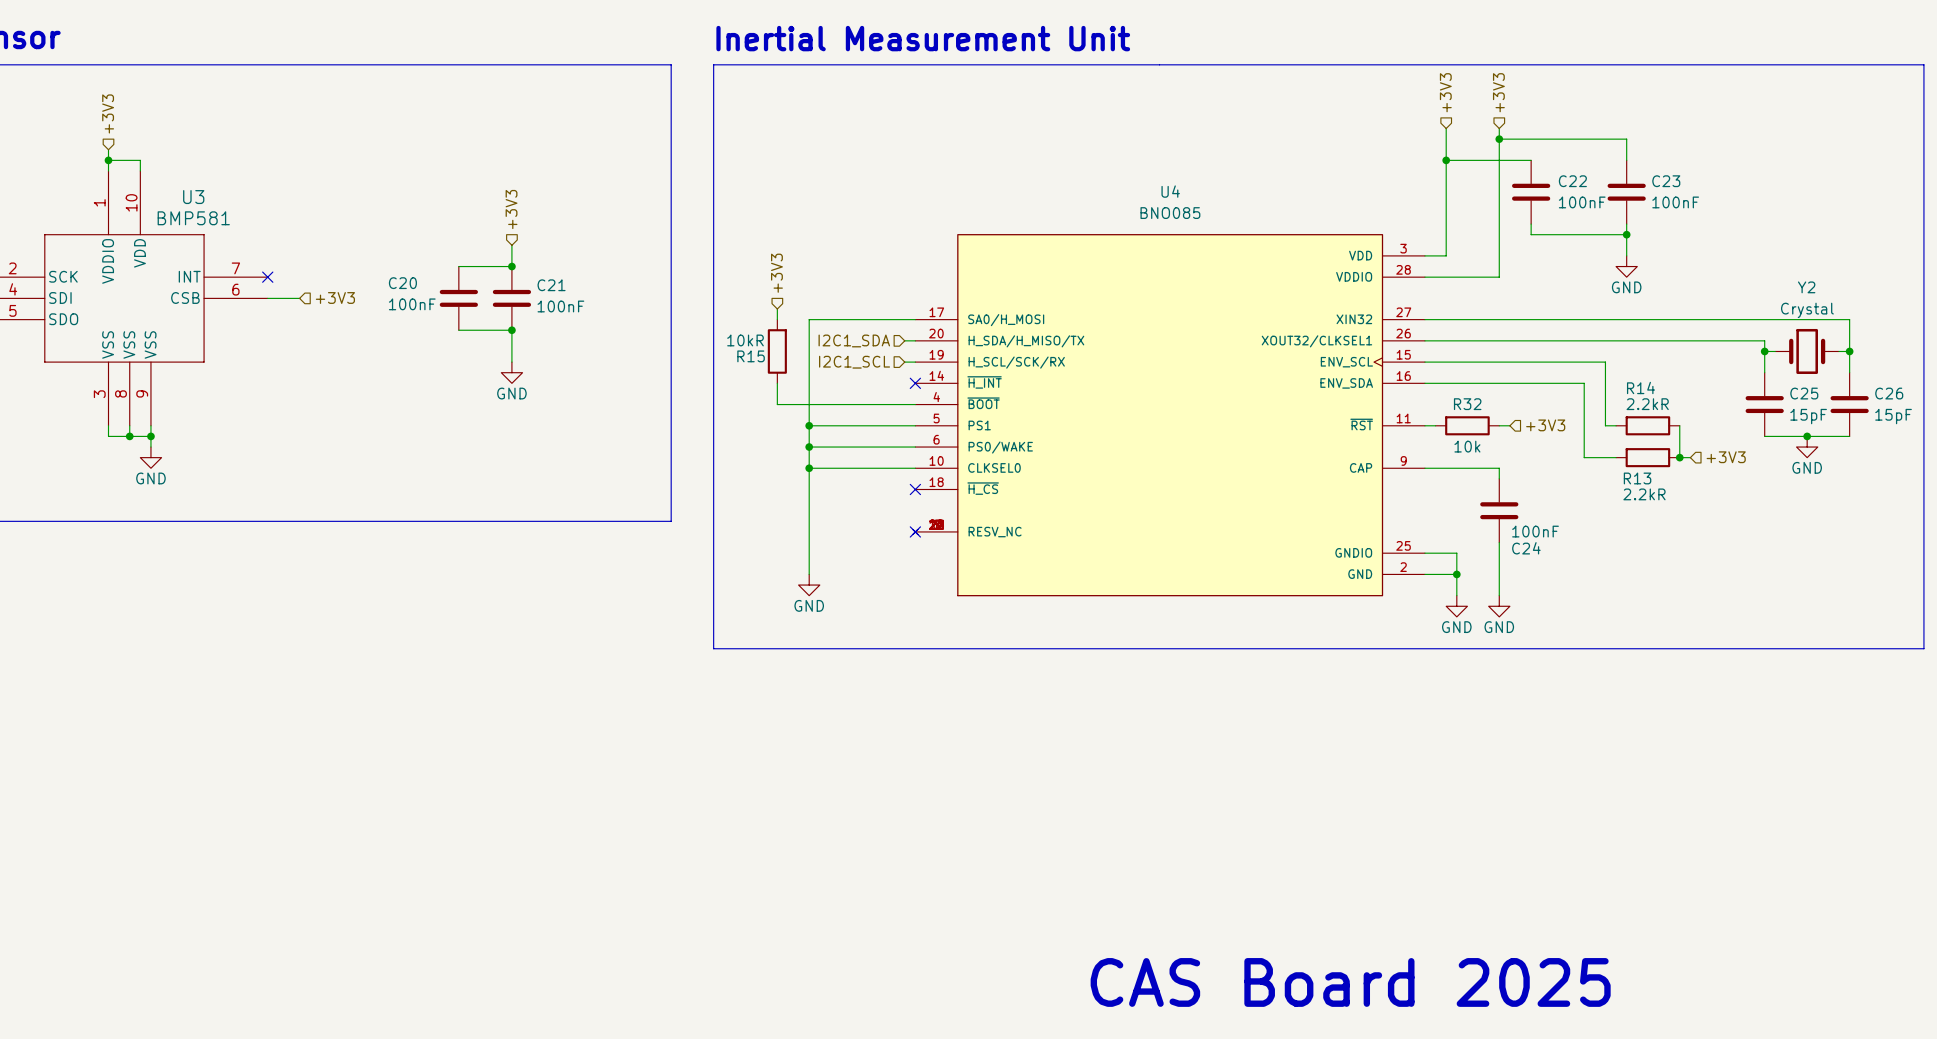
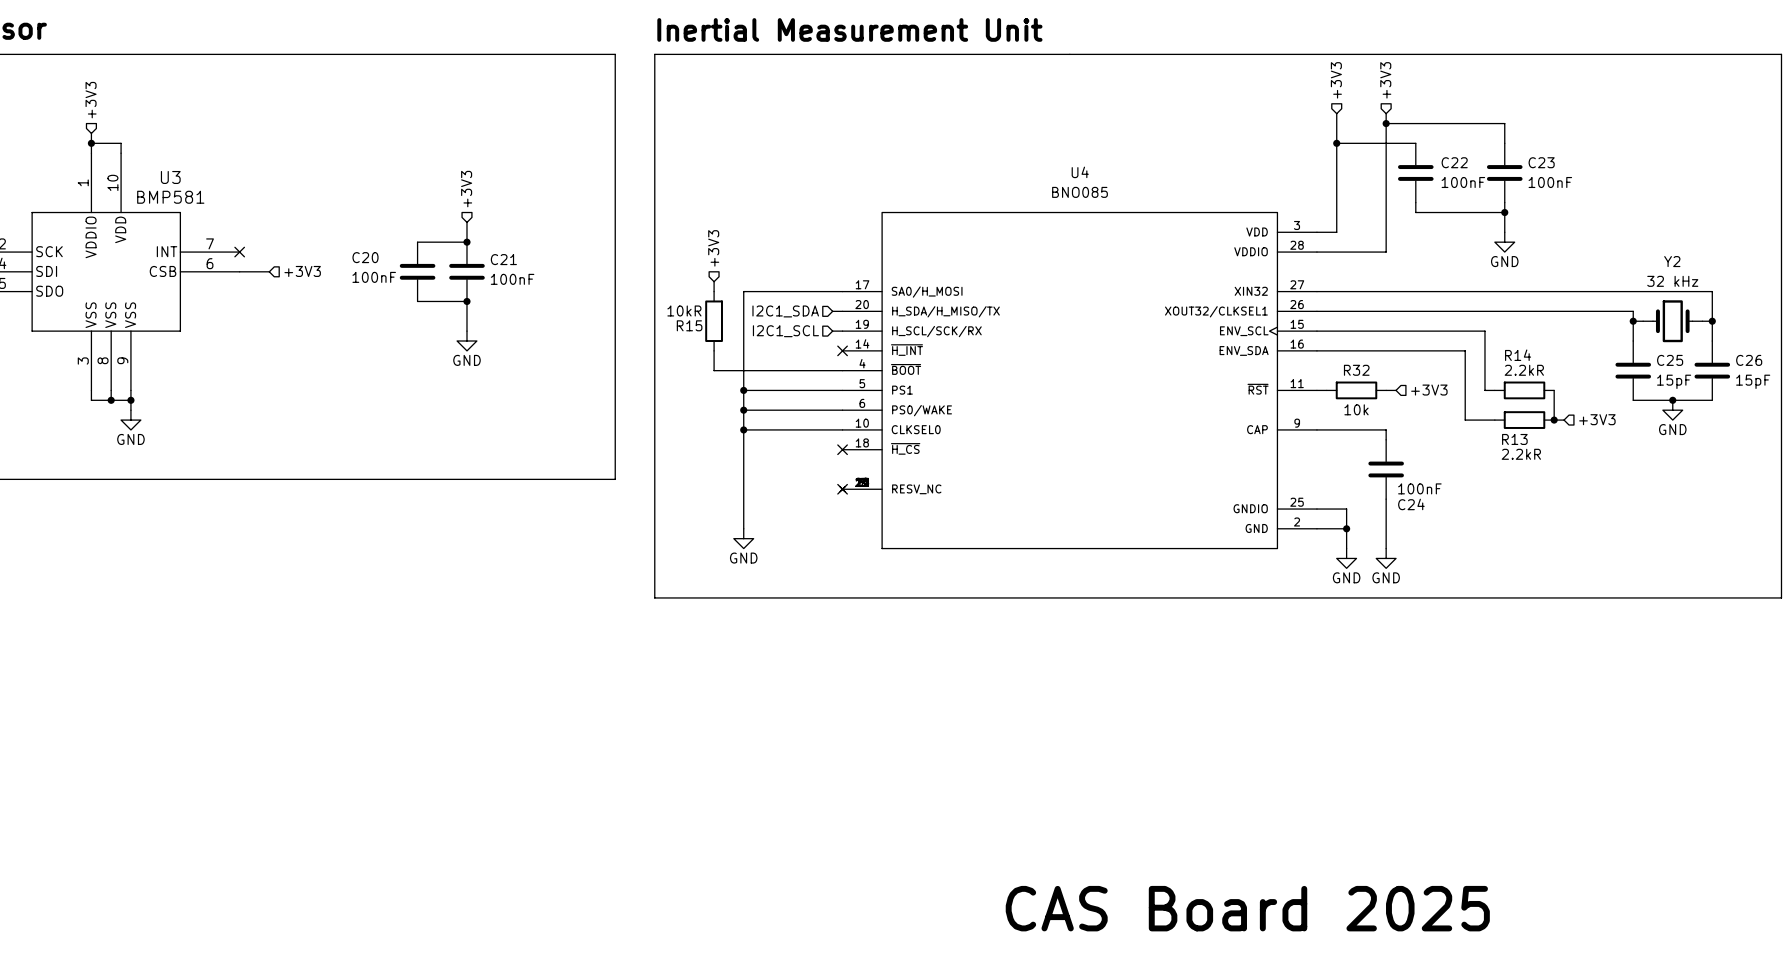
Y2 value: Crystal (1807, 310) -> 32 kHz (1672, 281)

